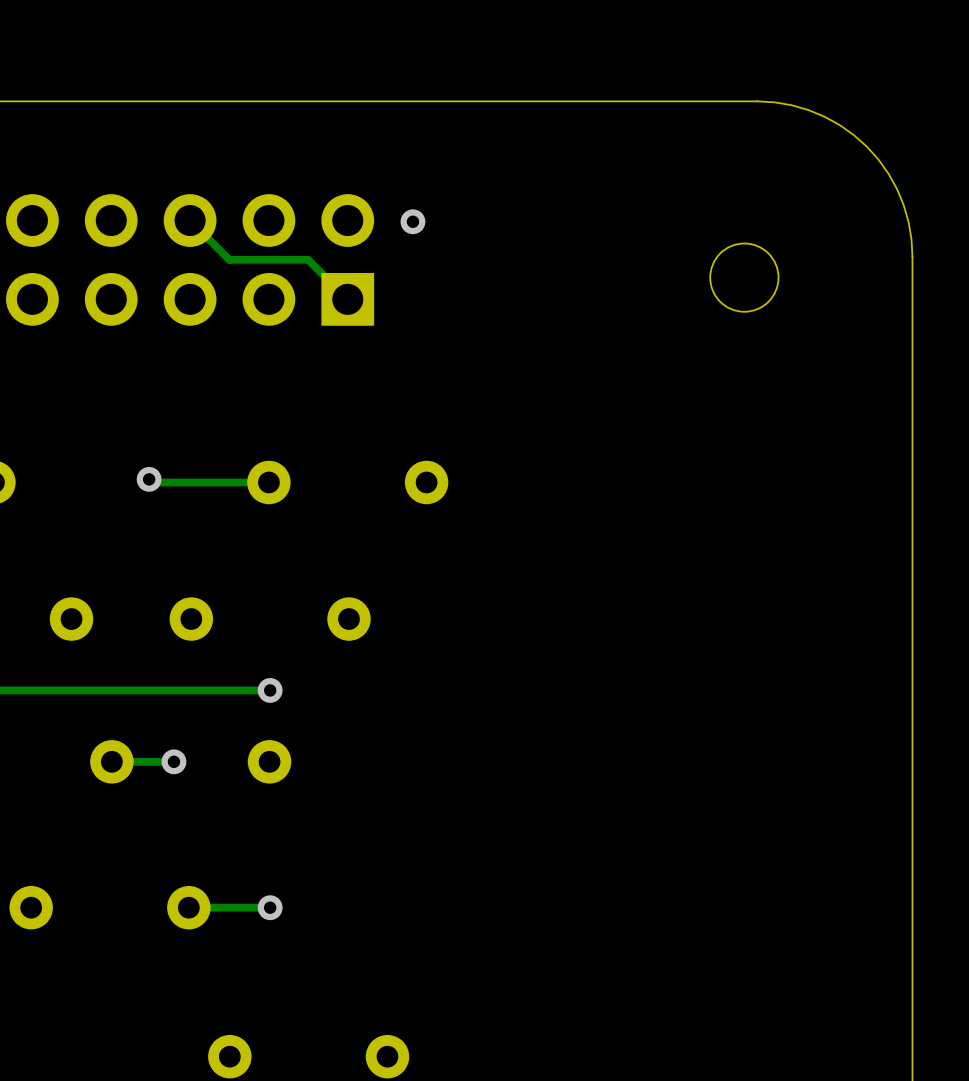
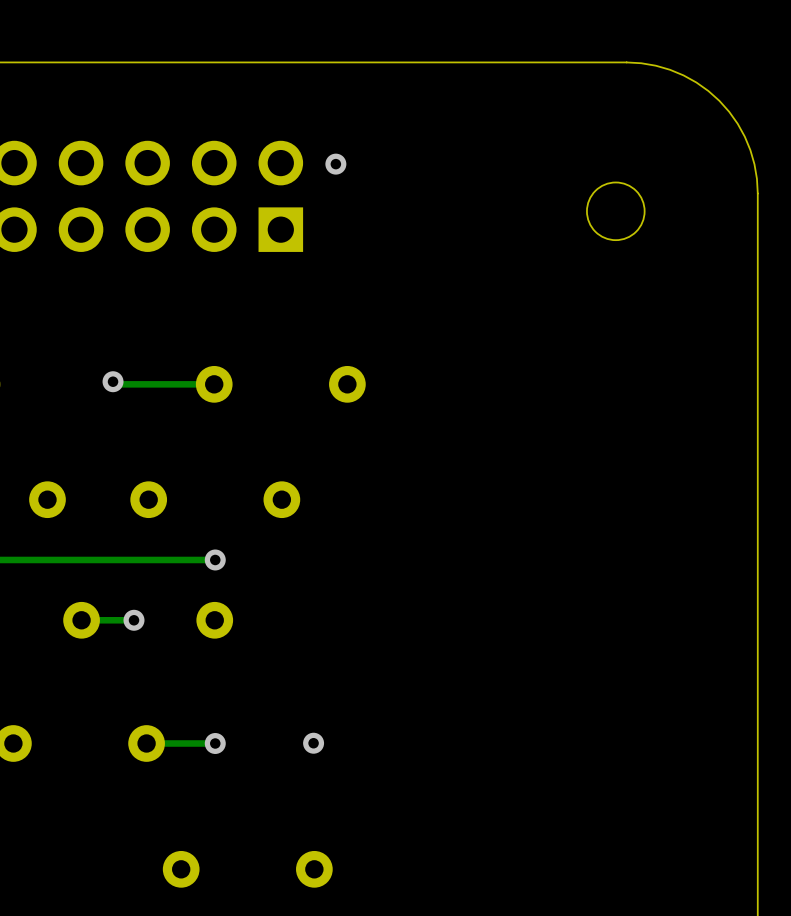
track: (190, 220) (229, 259) (308, 259) (347, 299) -> none
via: none -> (313, 743)

